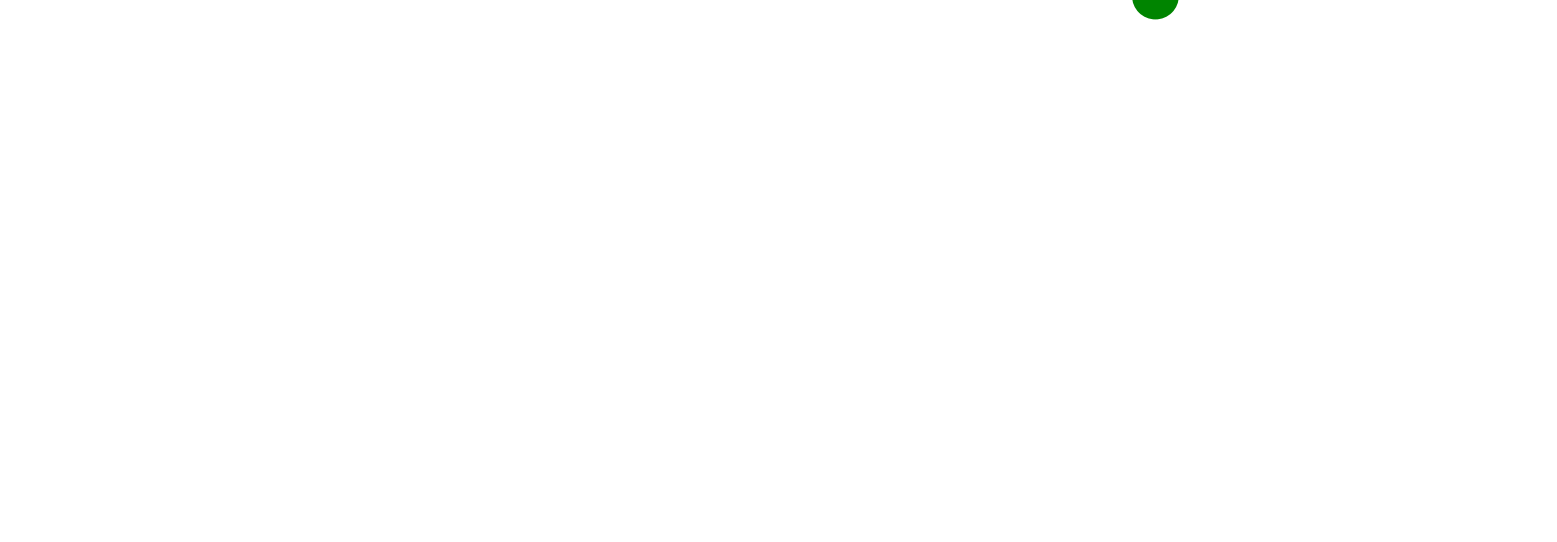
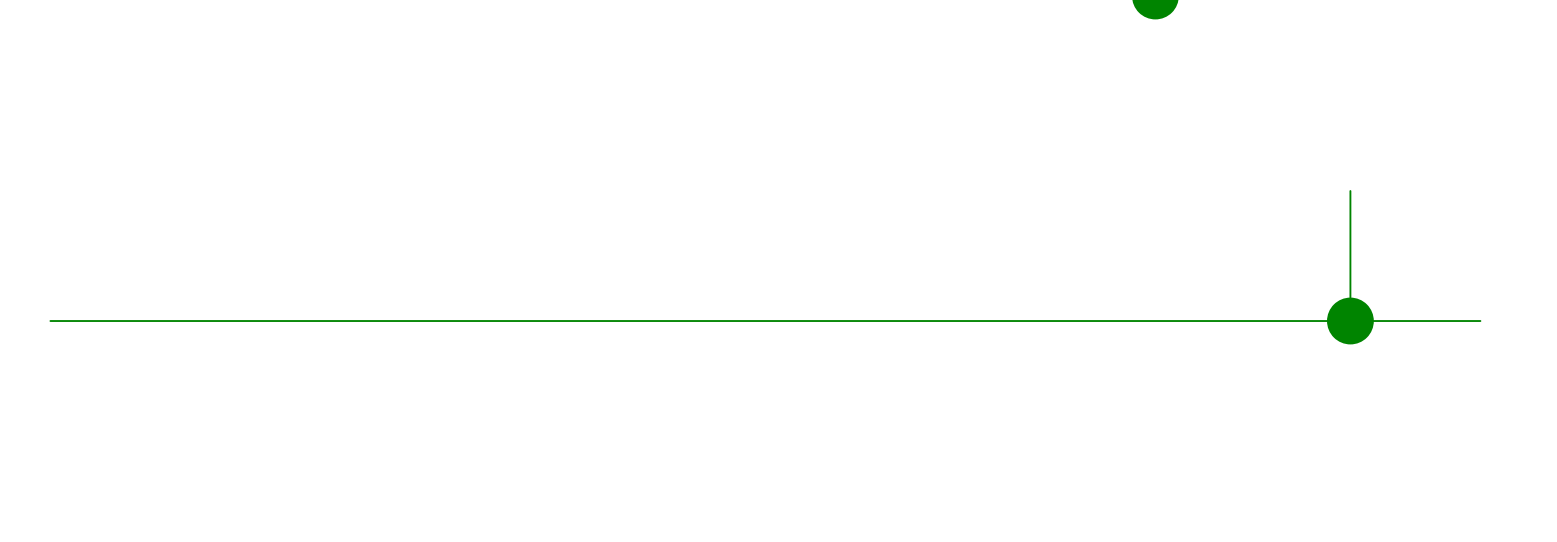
wire: none -> (1350, 191) (1350, 321)
wire: none -> (50, 321) (1480, 321)
junction: none -> (1350, 321)

